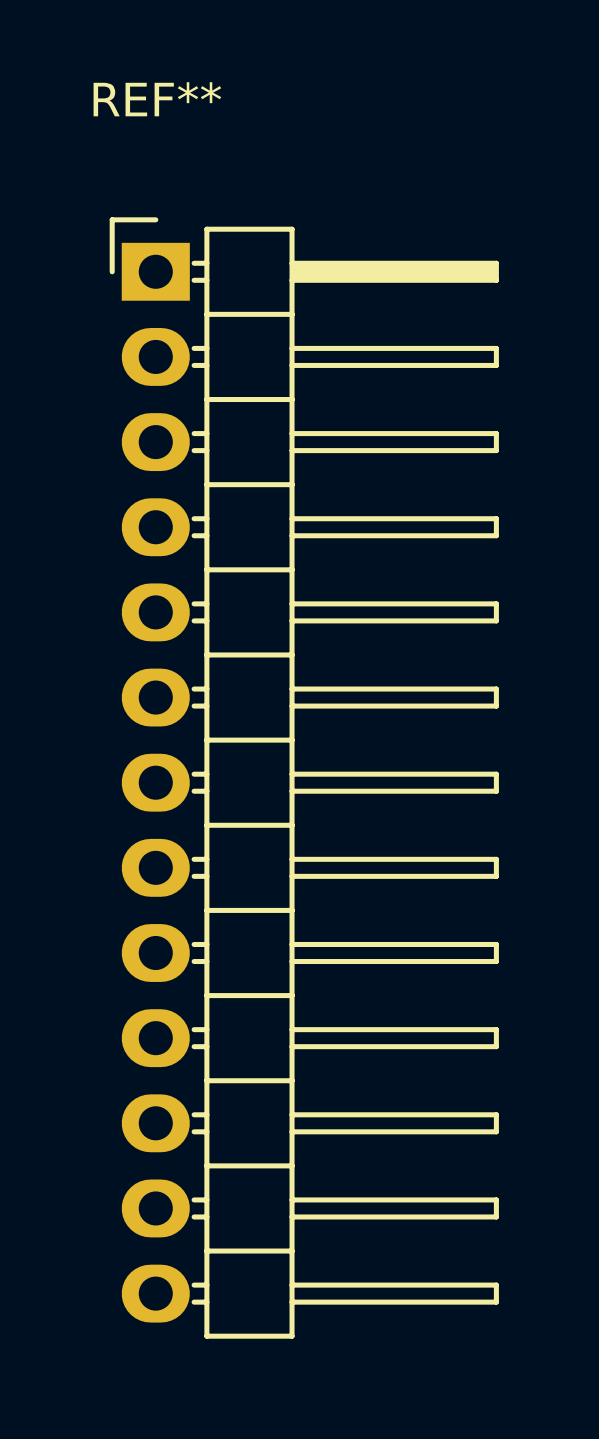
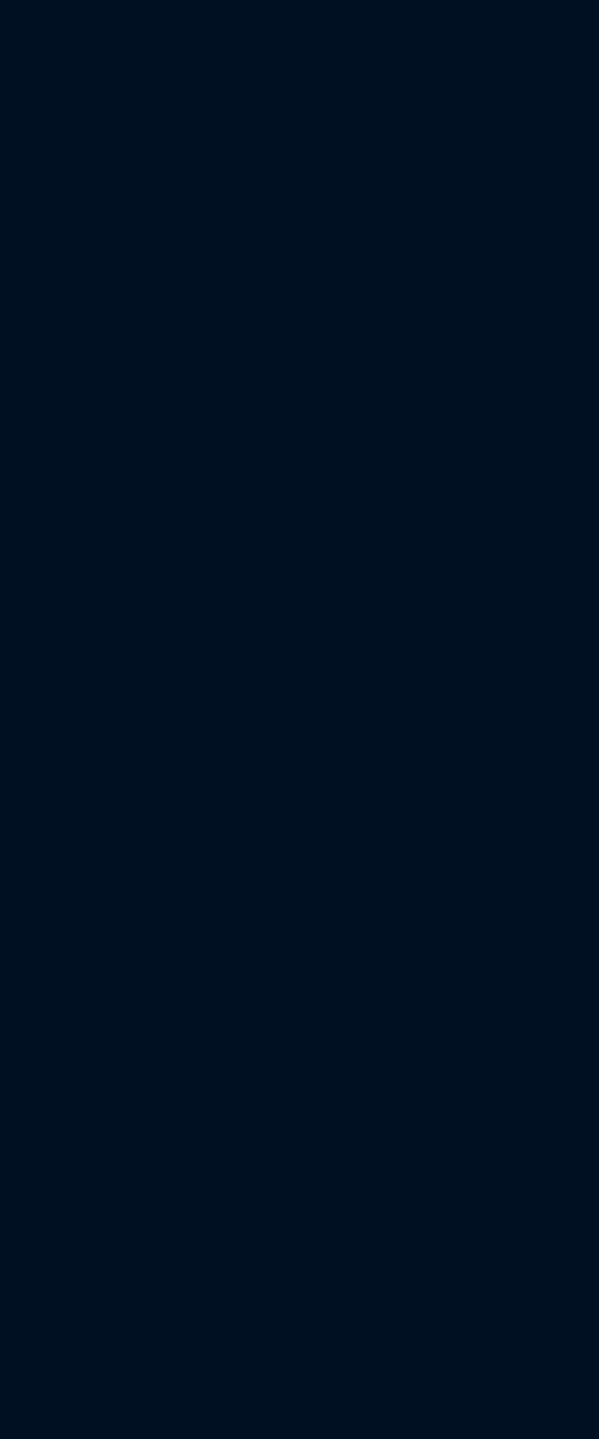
REF**: (304, 778) -> none

